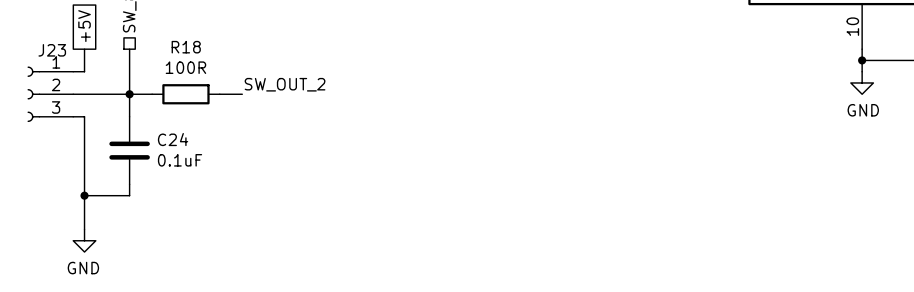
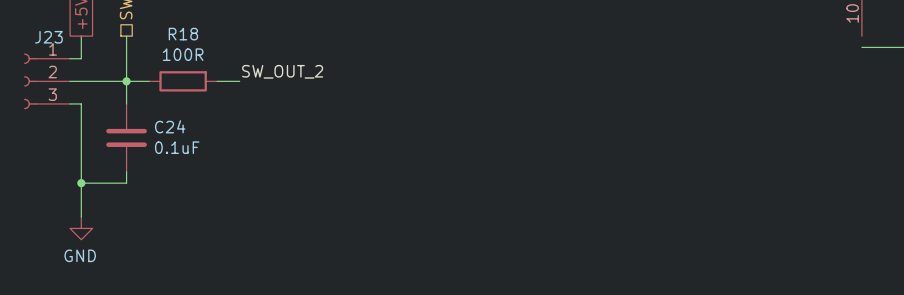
wire: (862, 49) (862, 71) -> none
junction: (862, 60) -> none
power symbol: GND (862, 82) -> none

